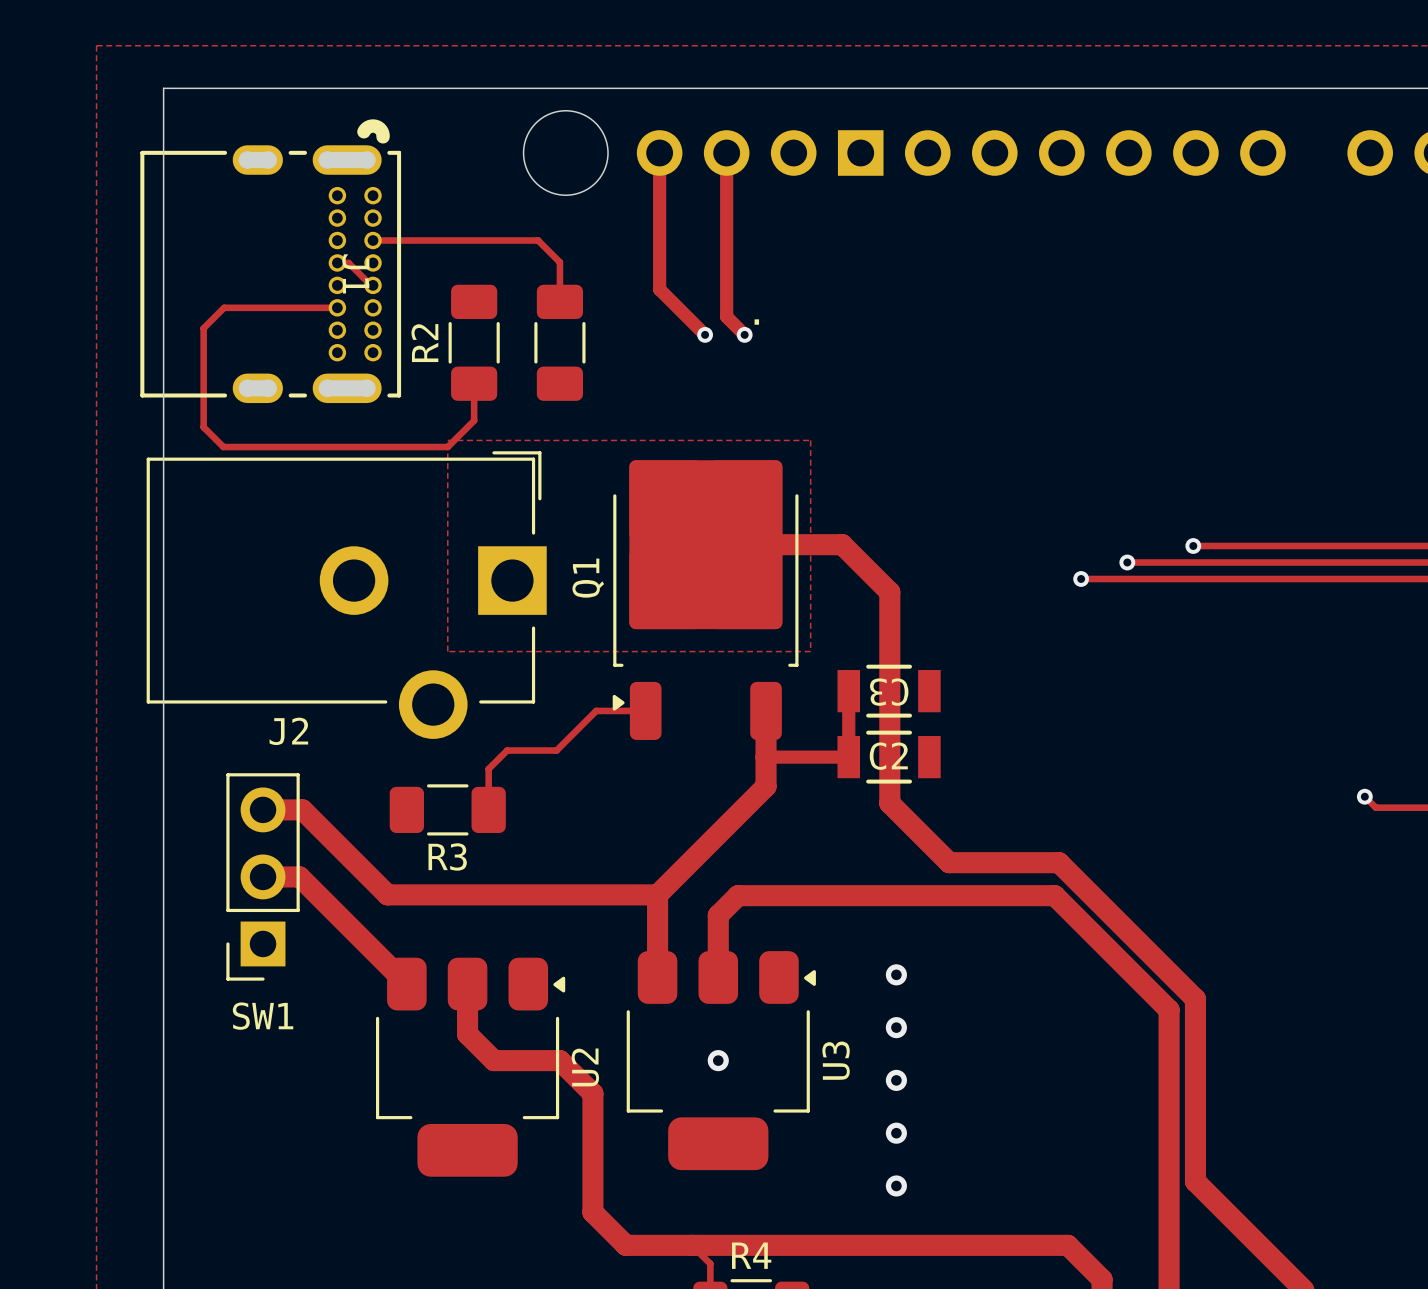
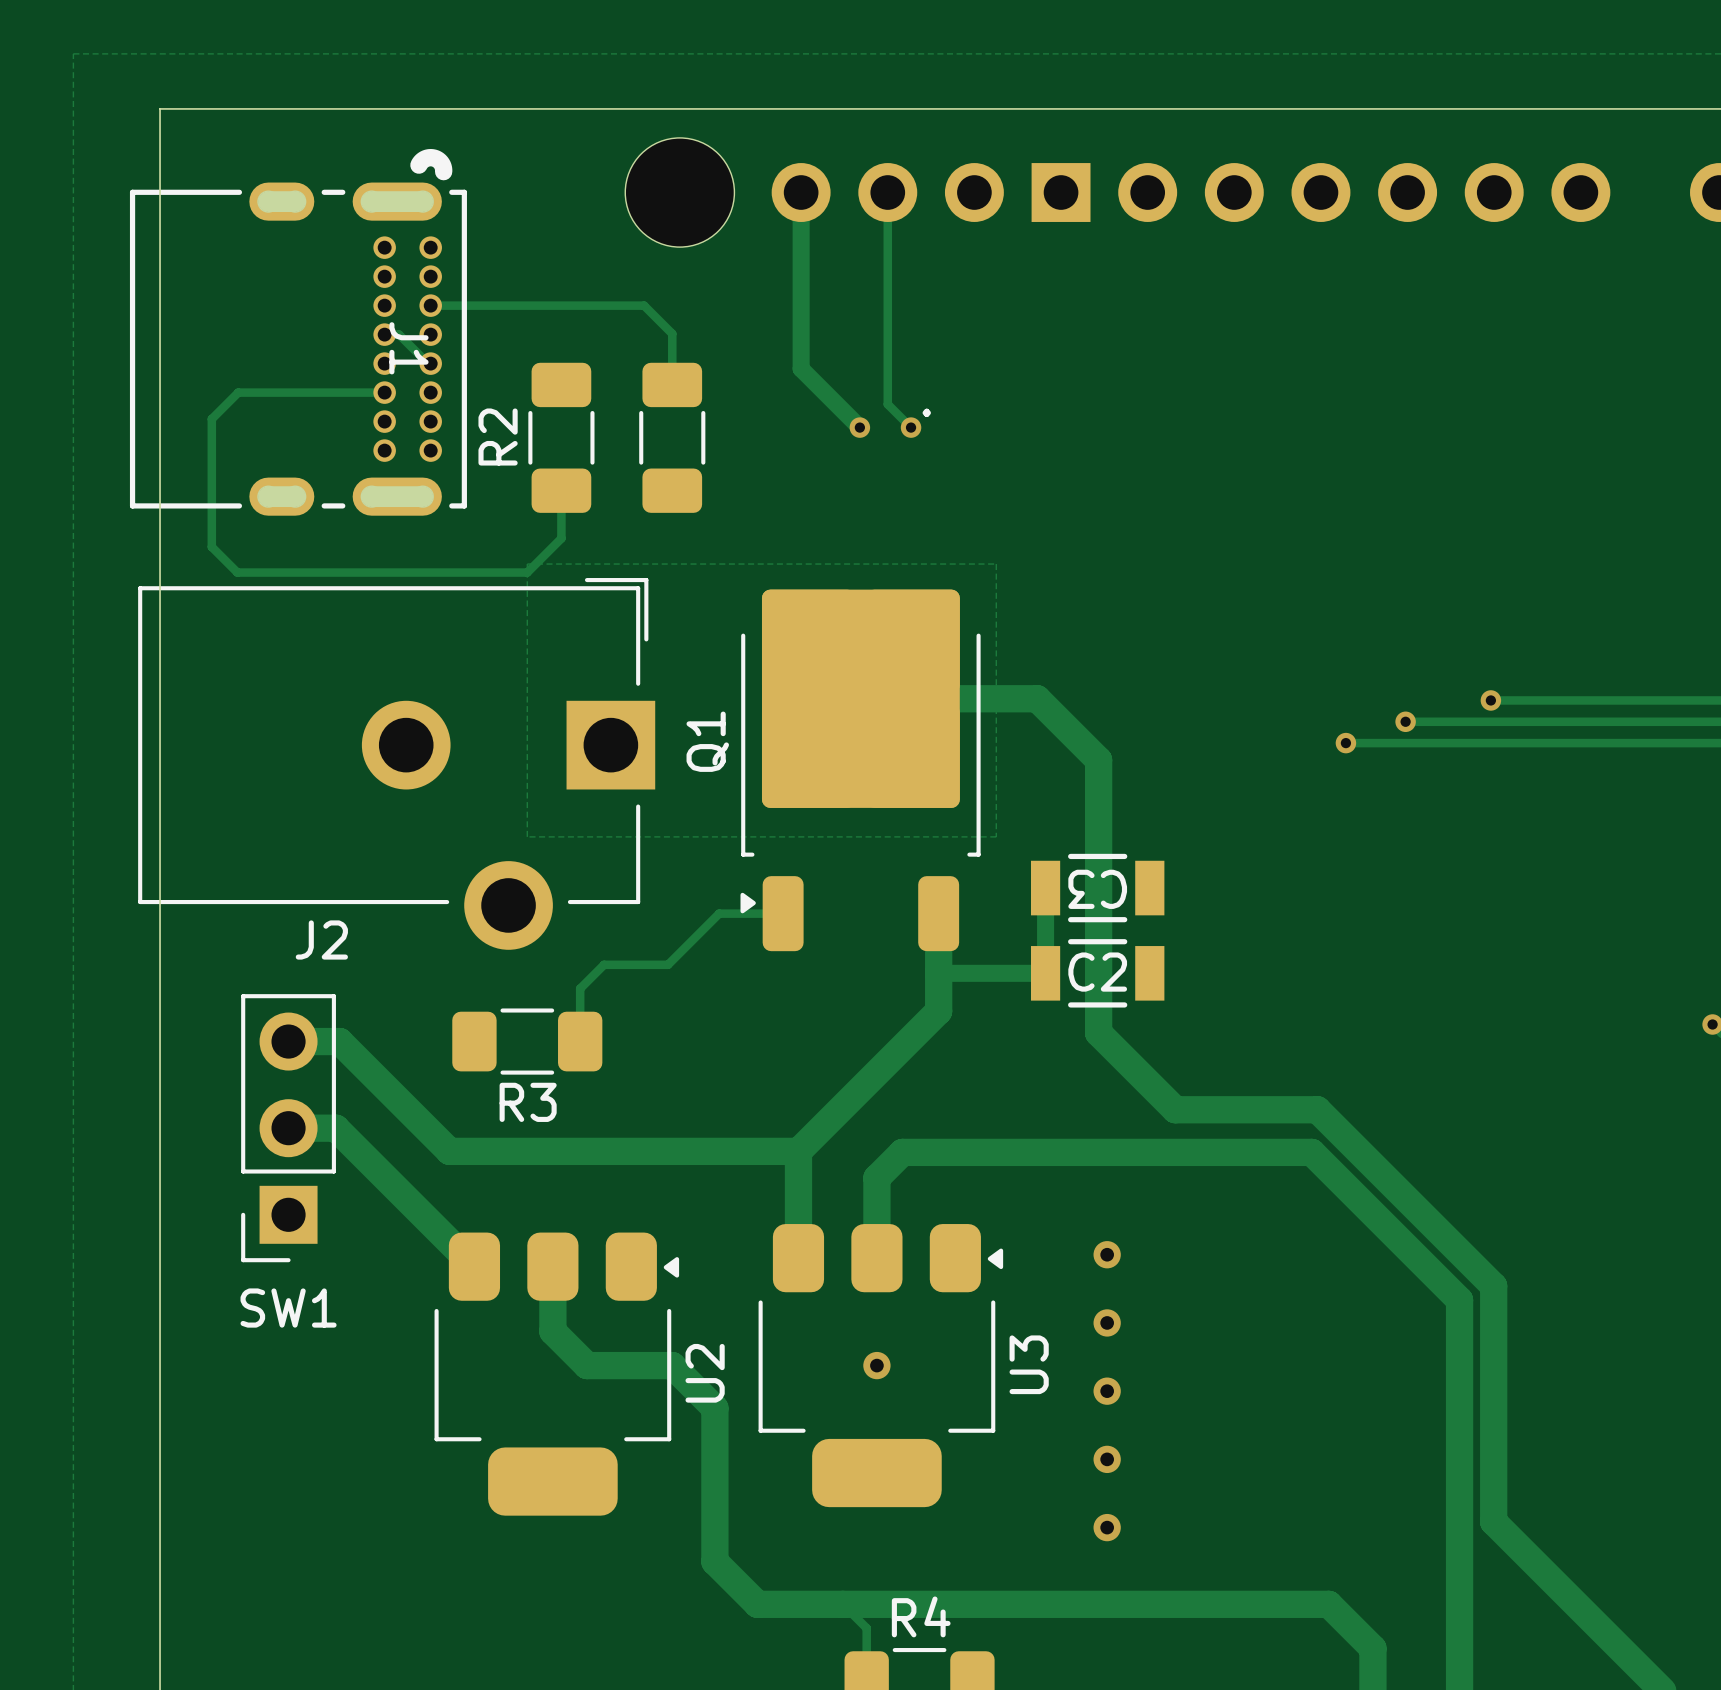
track width: thick (726, 152) (726, 316) (744, 334) -> thin (887, 192) (887, 404) (911, 427)

